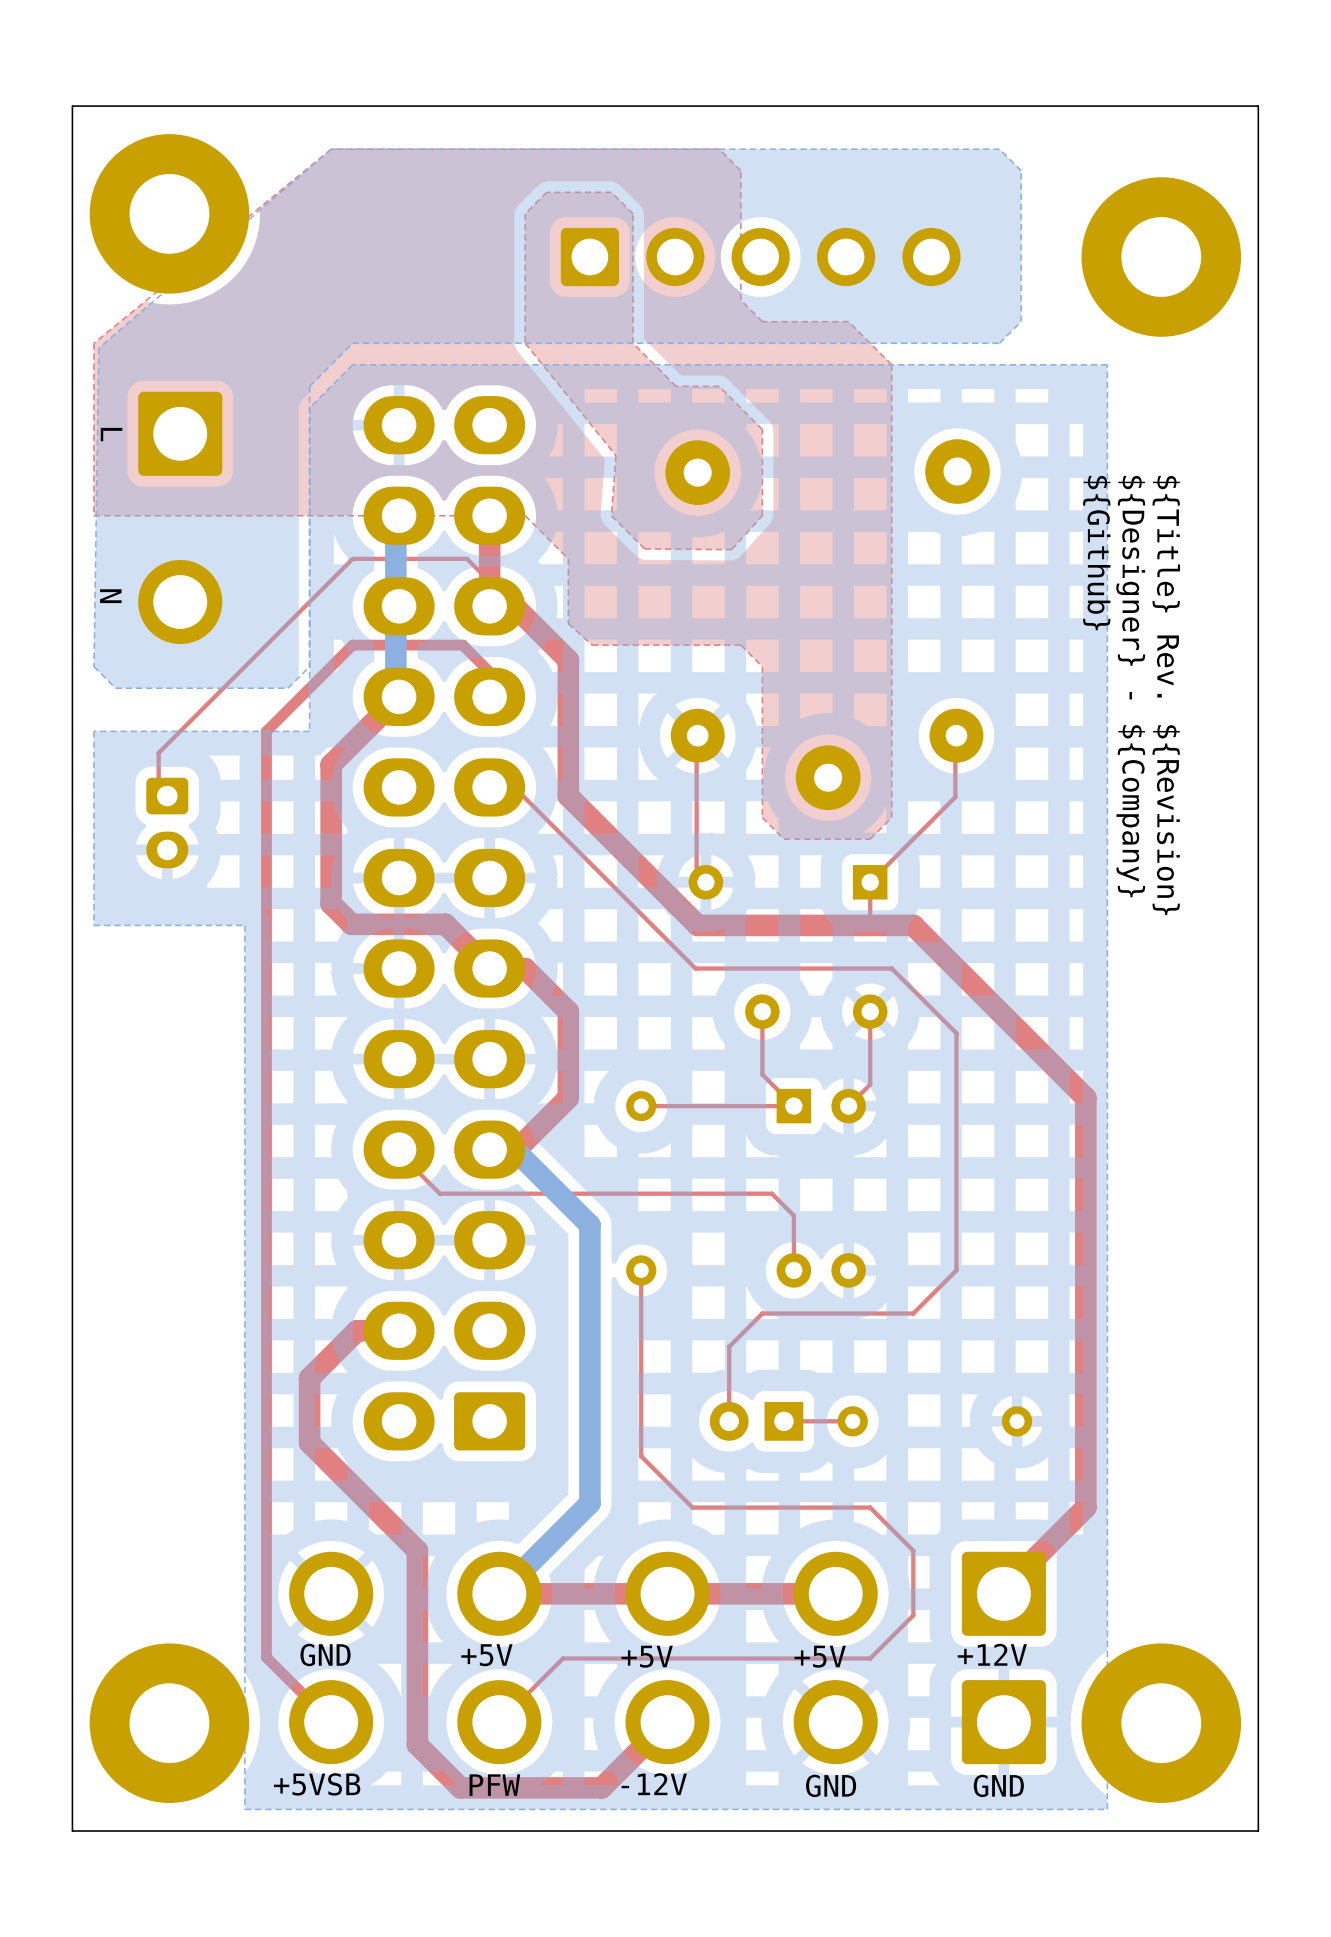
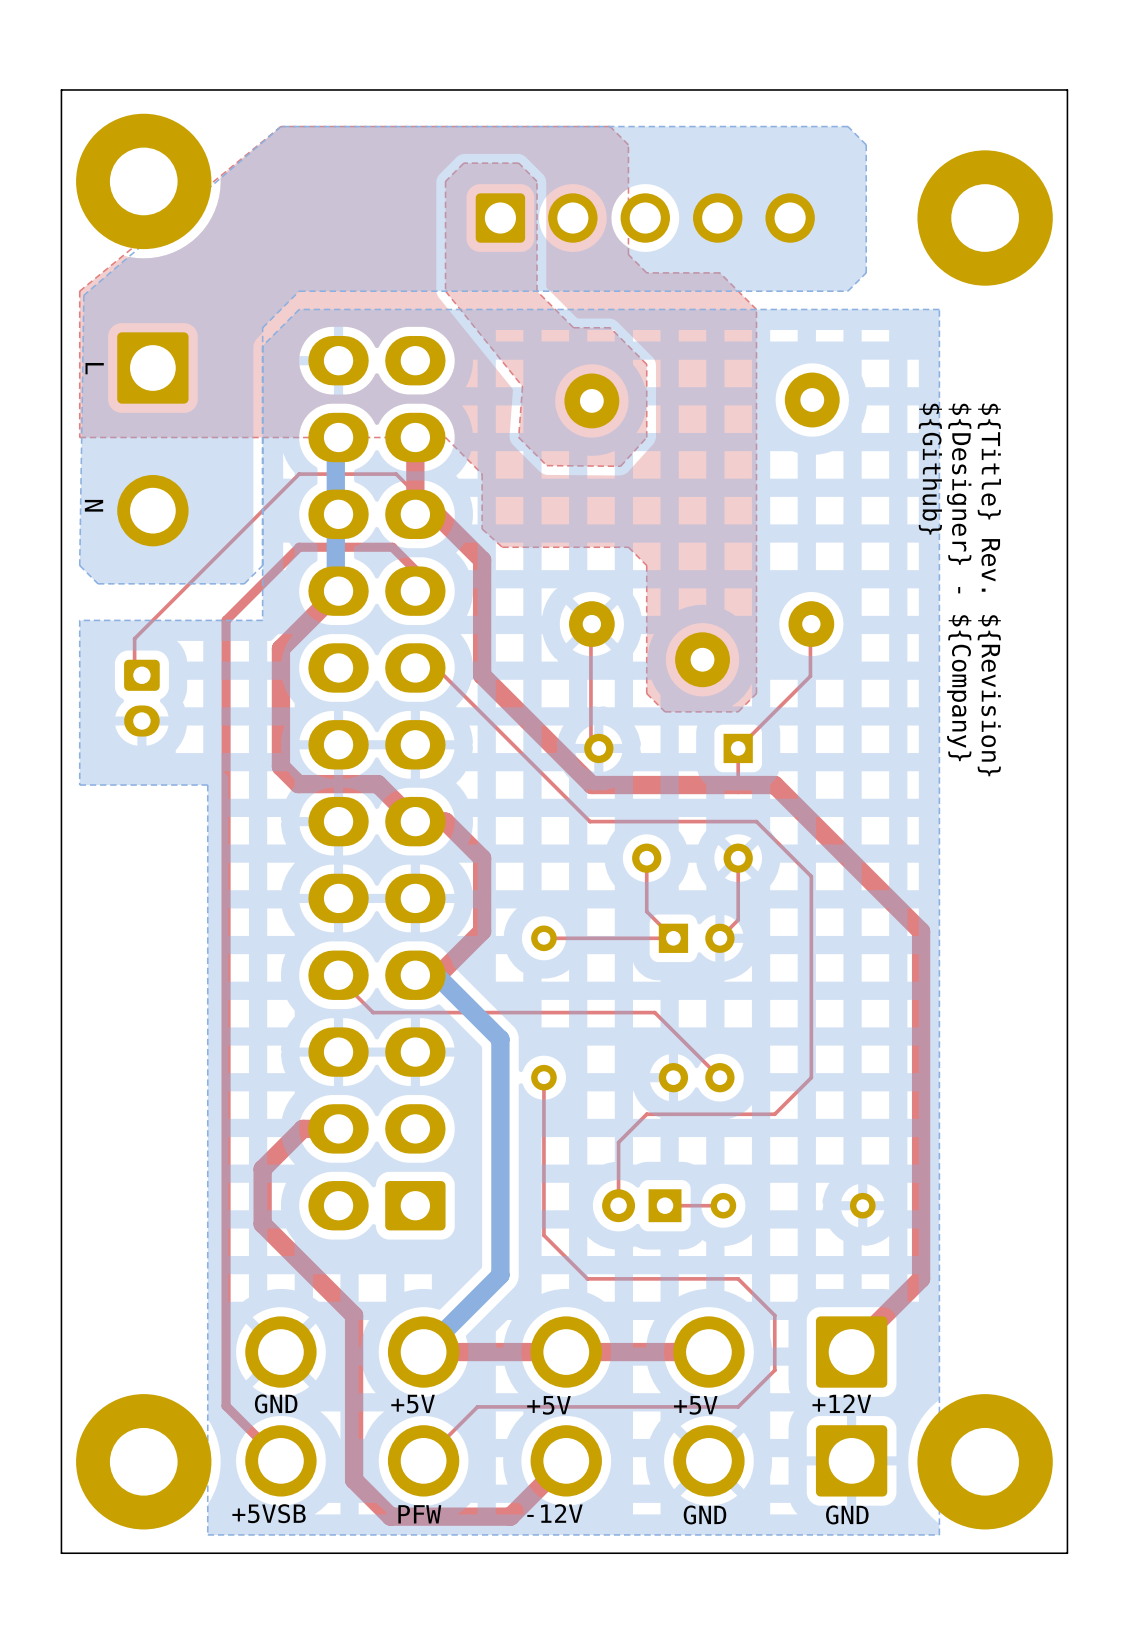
top track: (793, 1215) (793, 1270) -> (673, 1031) (719, 1077)

